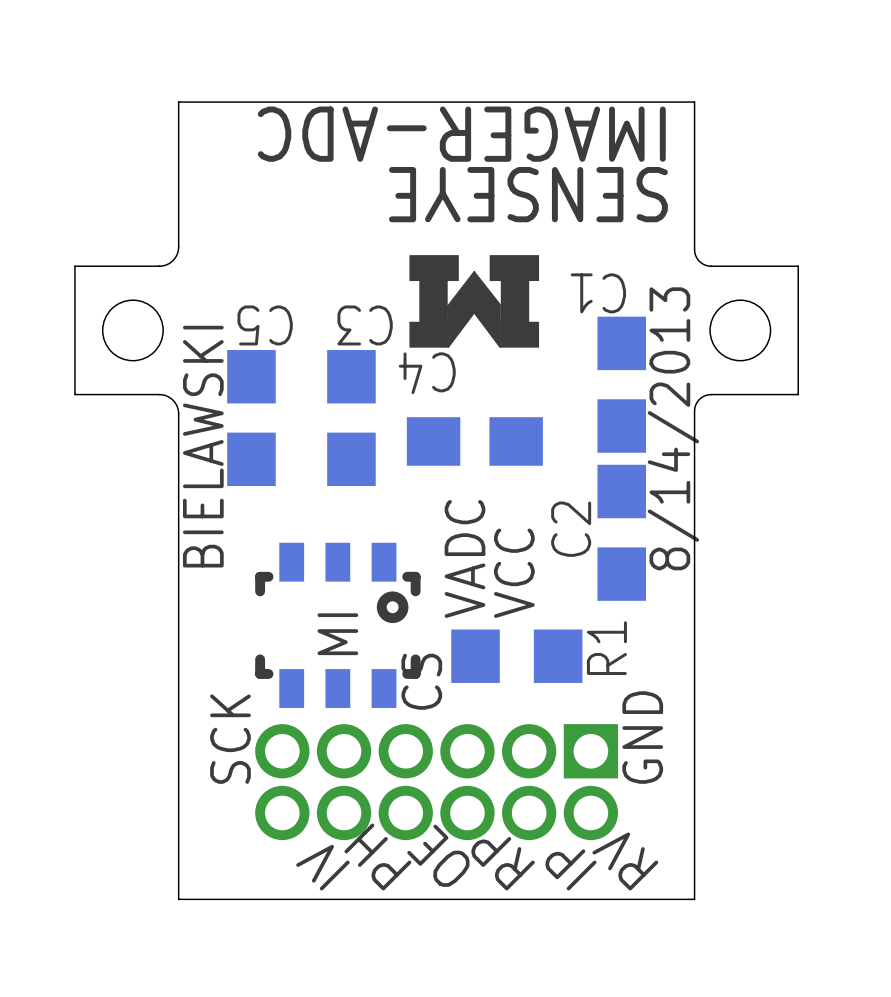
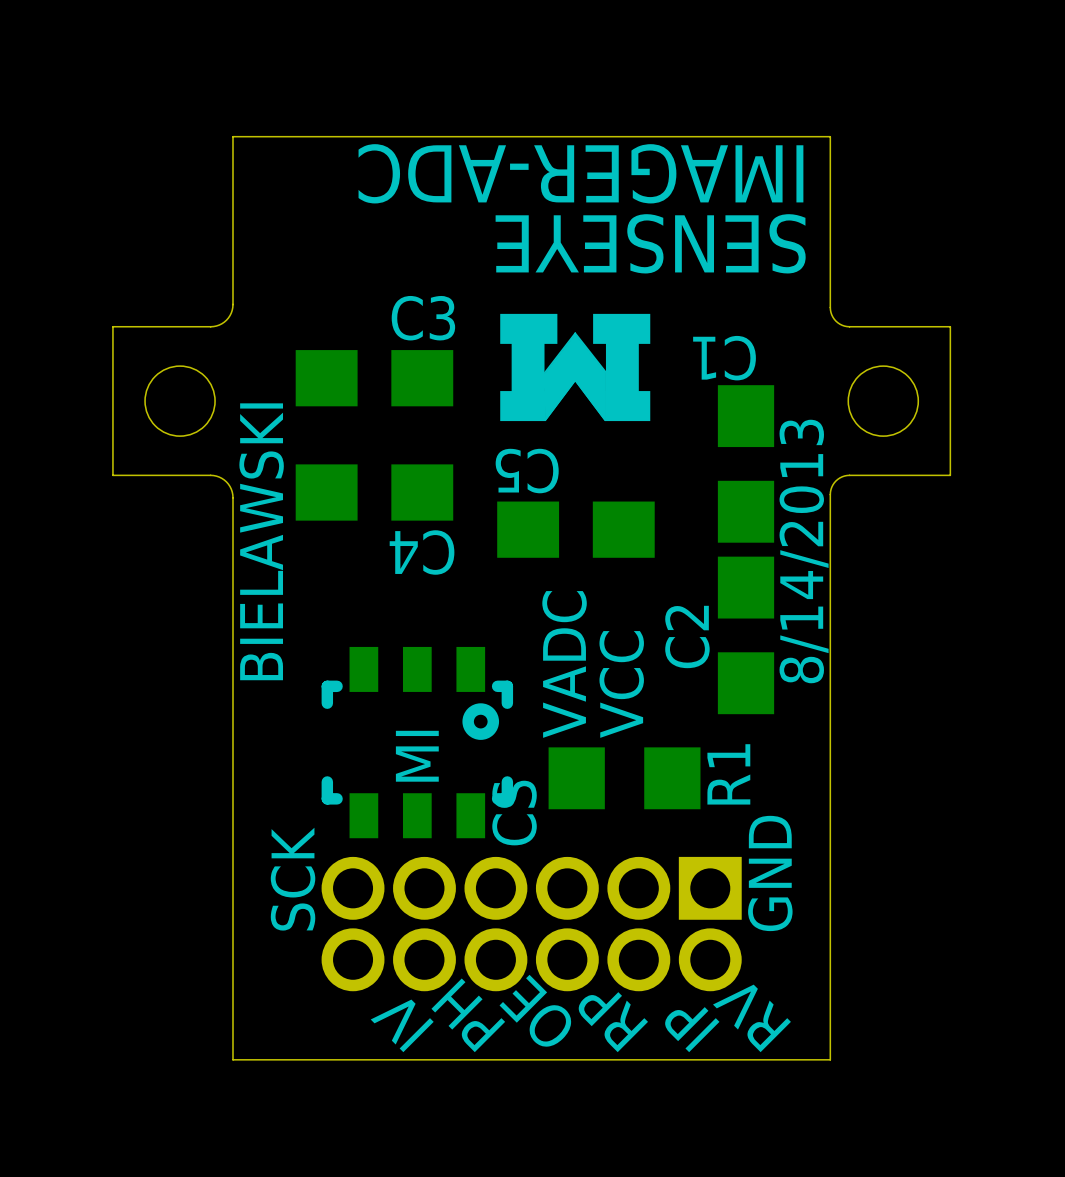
C4 name: C4 (427, 373) -> C5 (527, 471)
C4: none -> (374, 492)
C5: (251, 418) -> none
C3 rotation: 0° (351, 418) -> 90° clockwise (374, 378)
C3 position: (351, 418) -> (374, 378)

